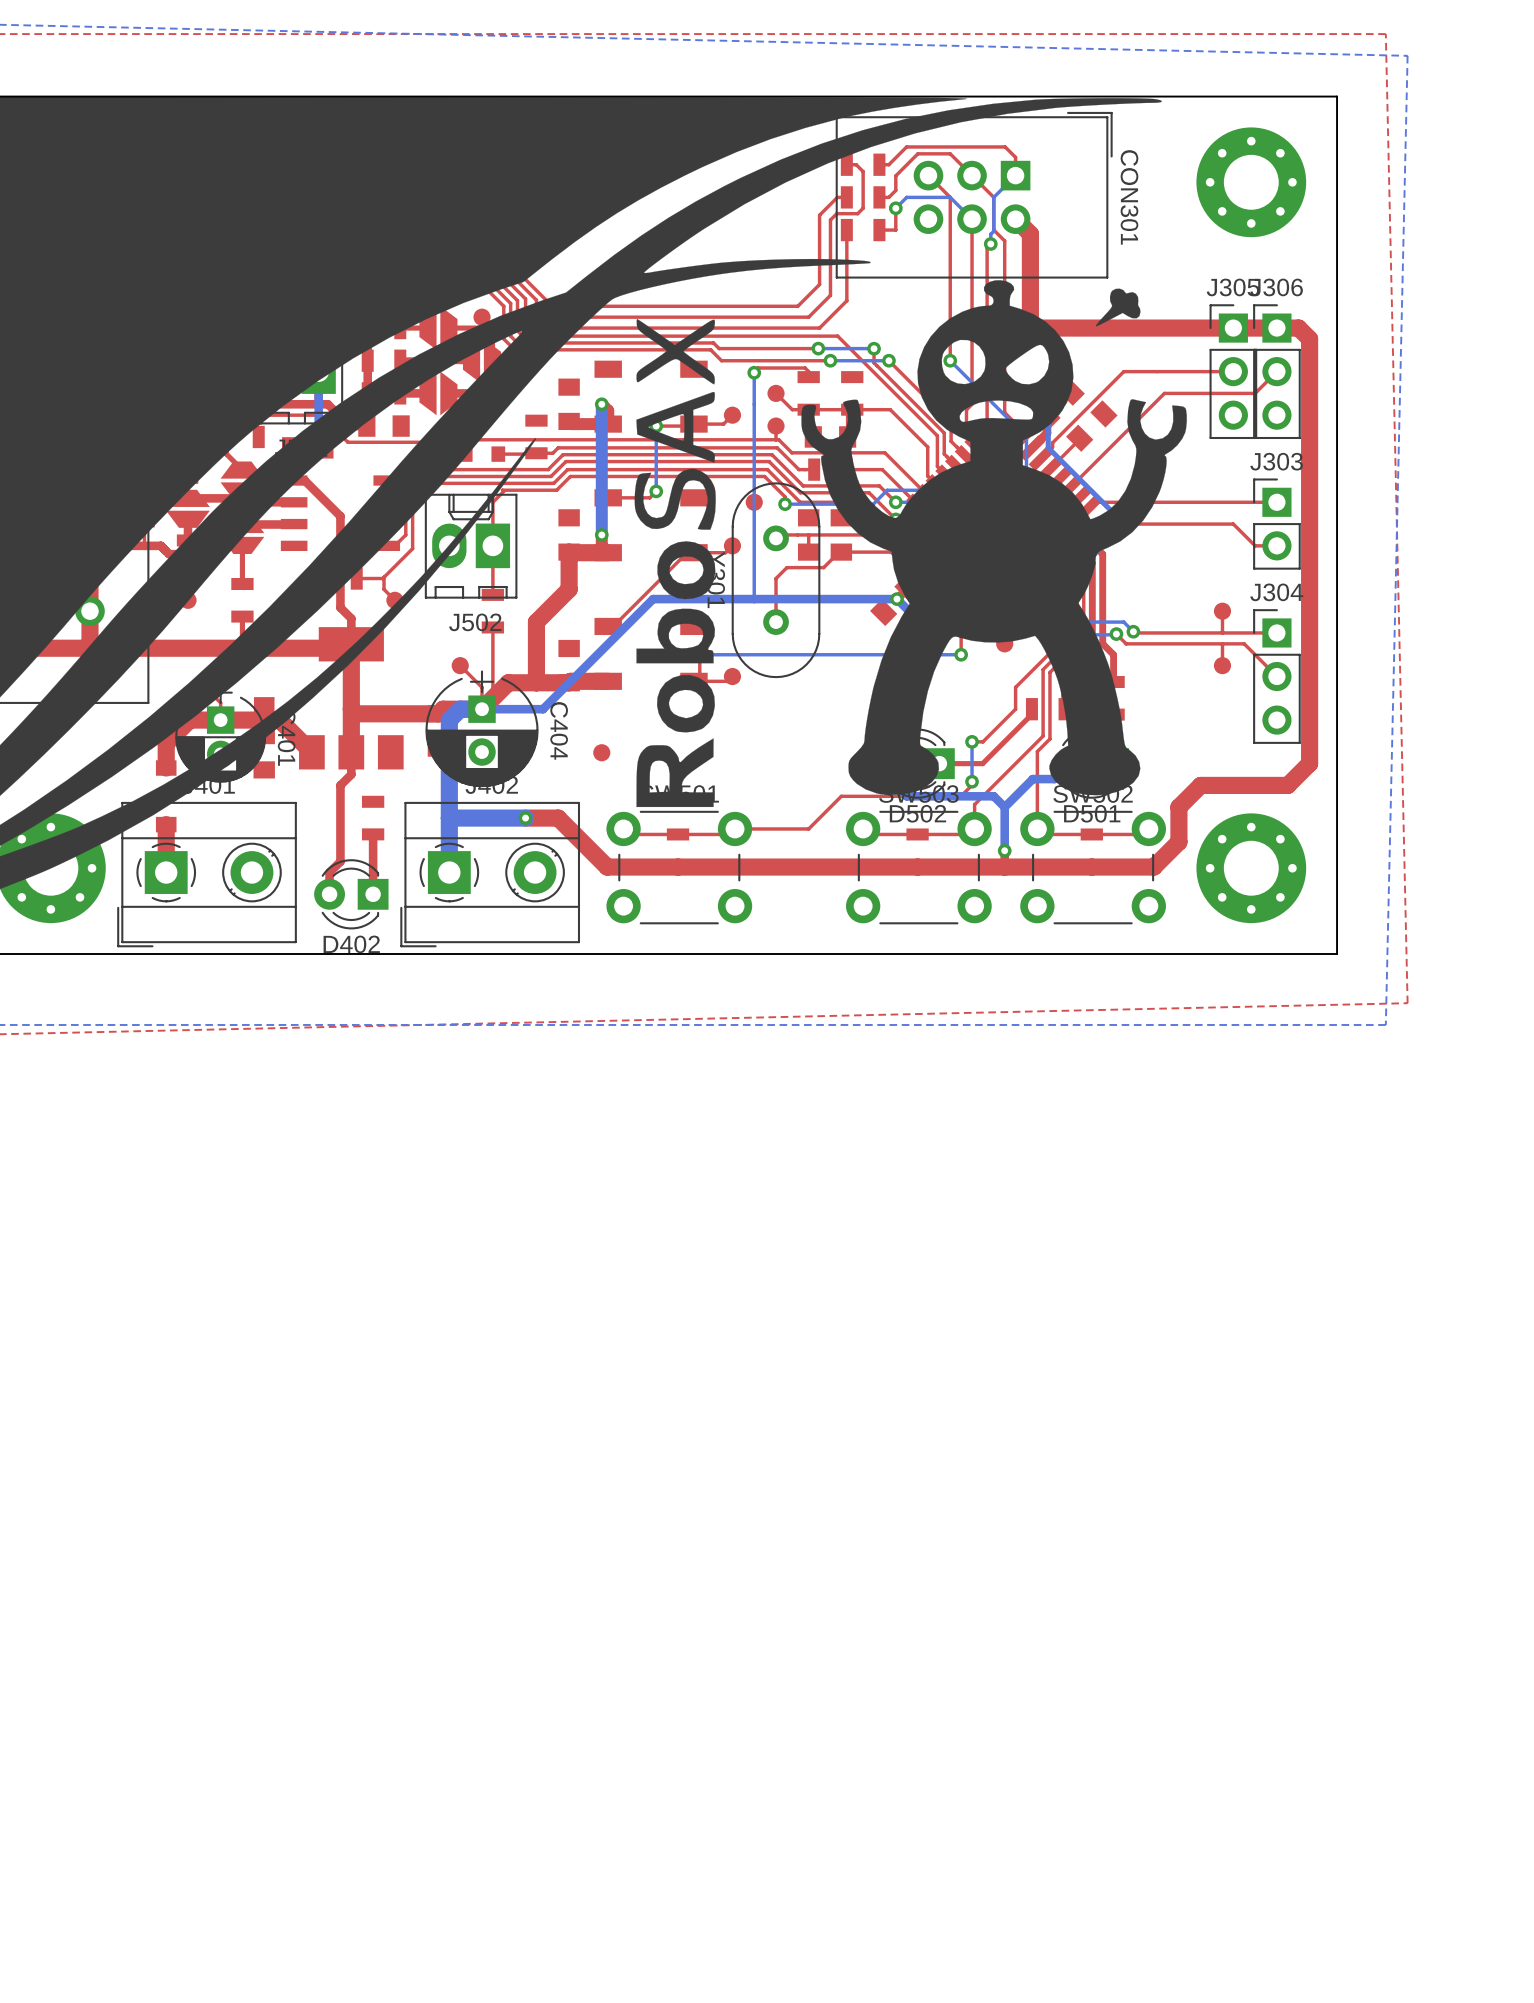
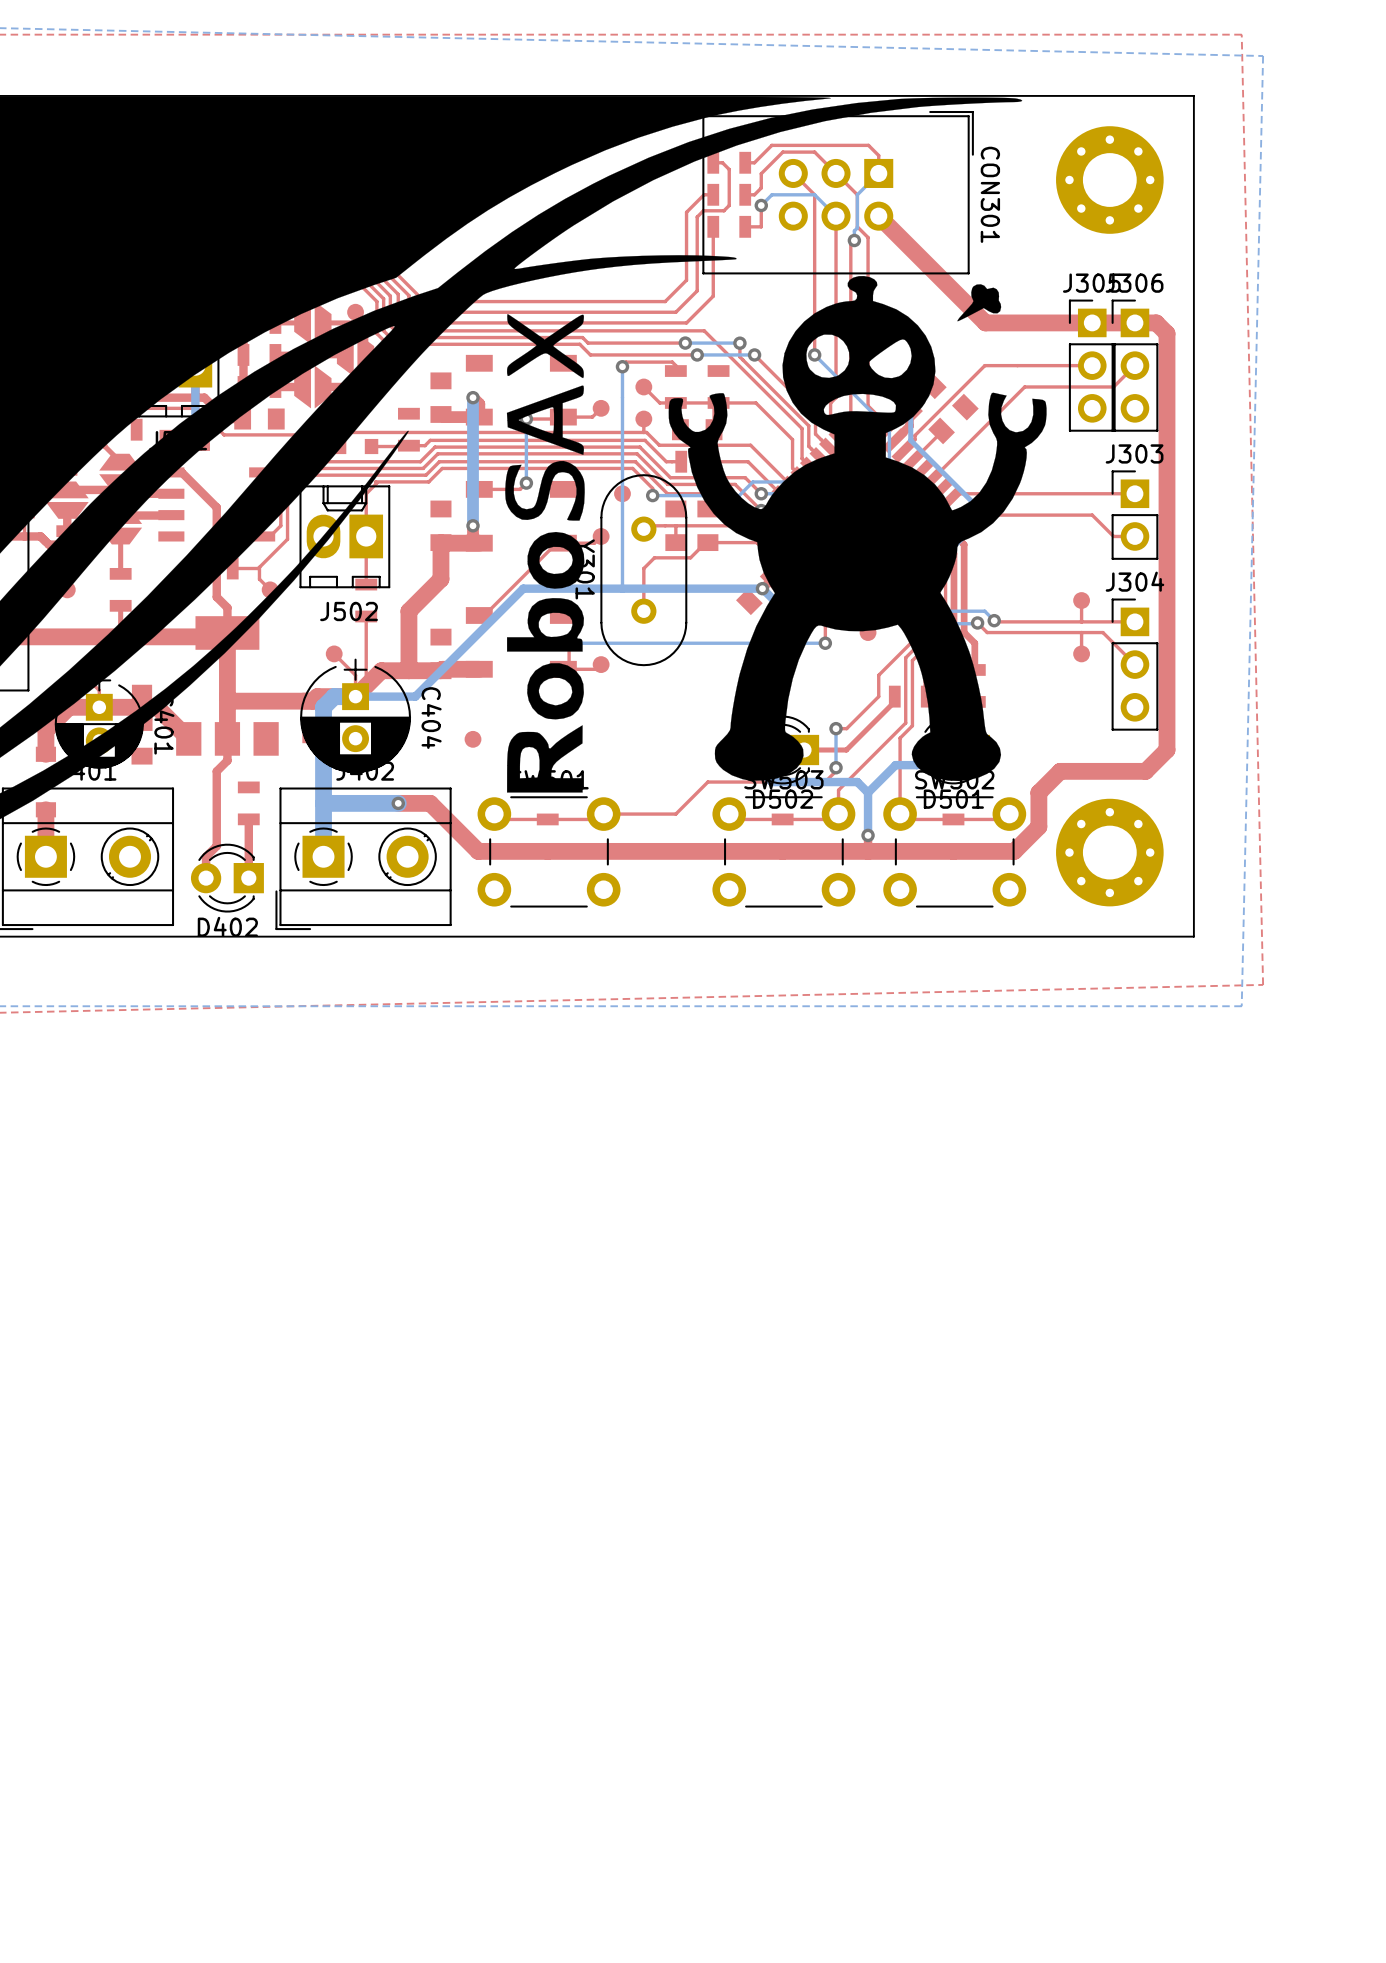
top track: (1030, 233) (1030, 321) (1037, 328) (1124, 328) -> (893, 230) (985, 322)

